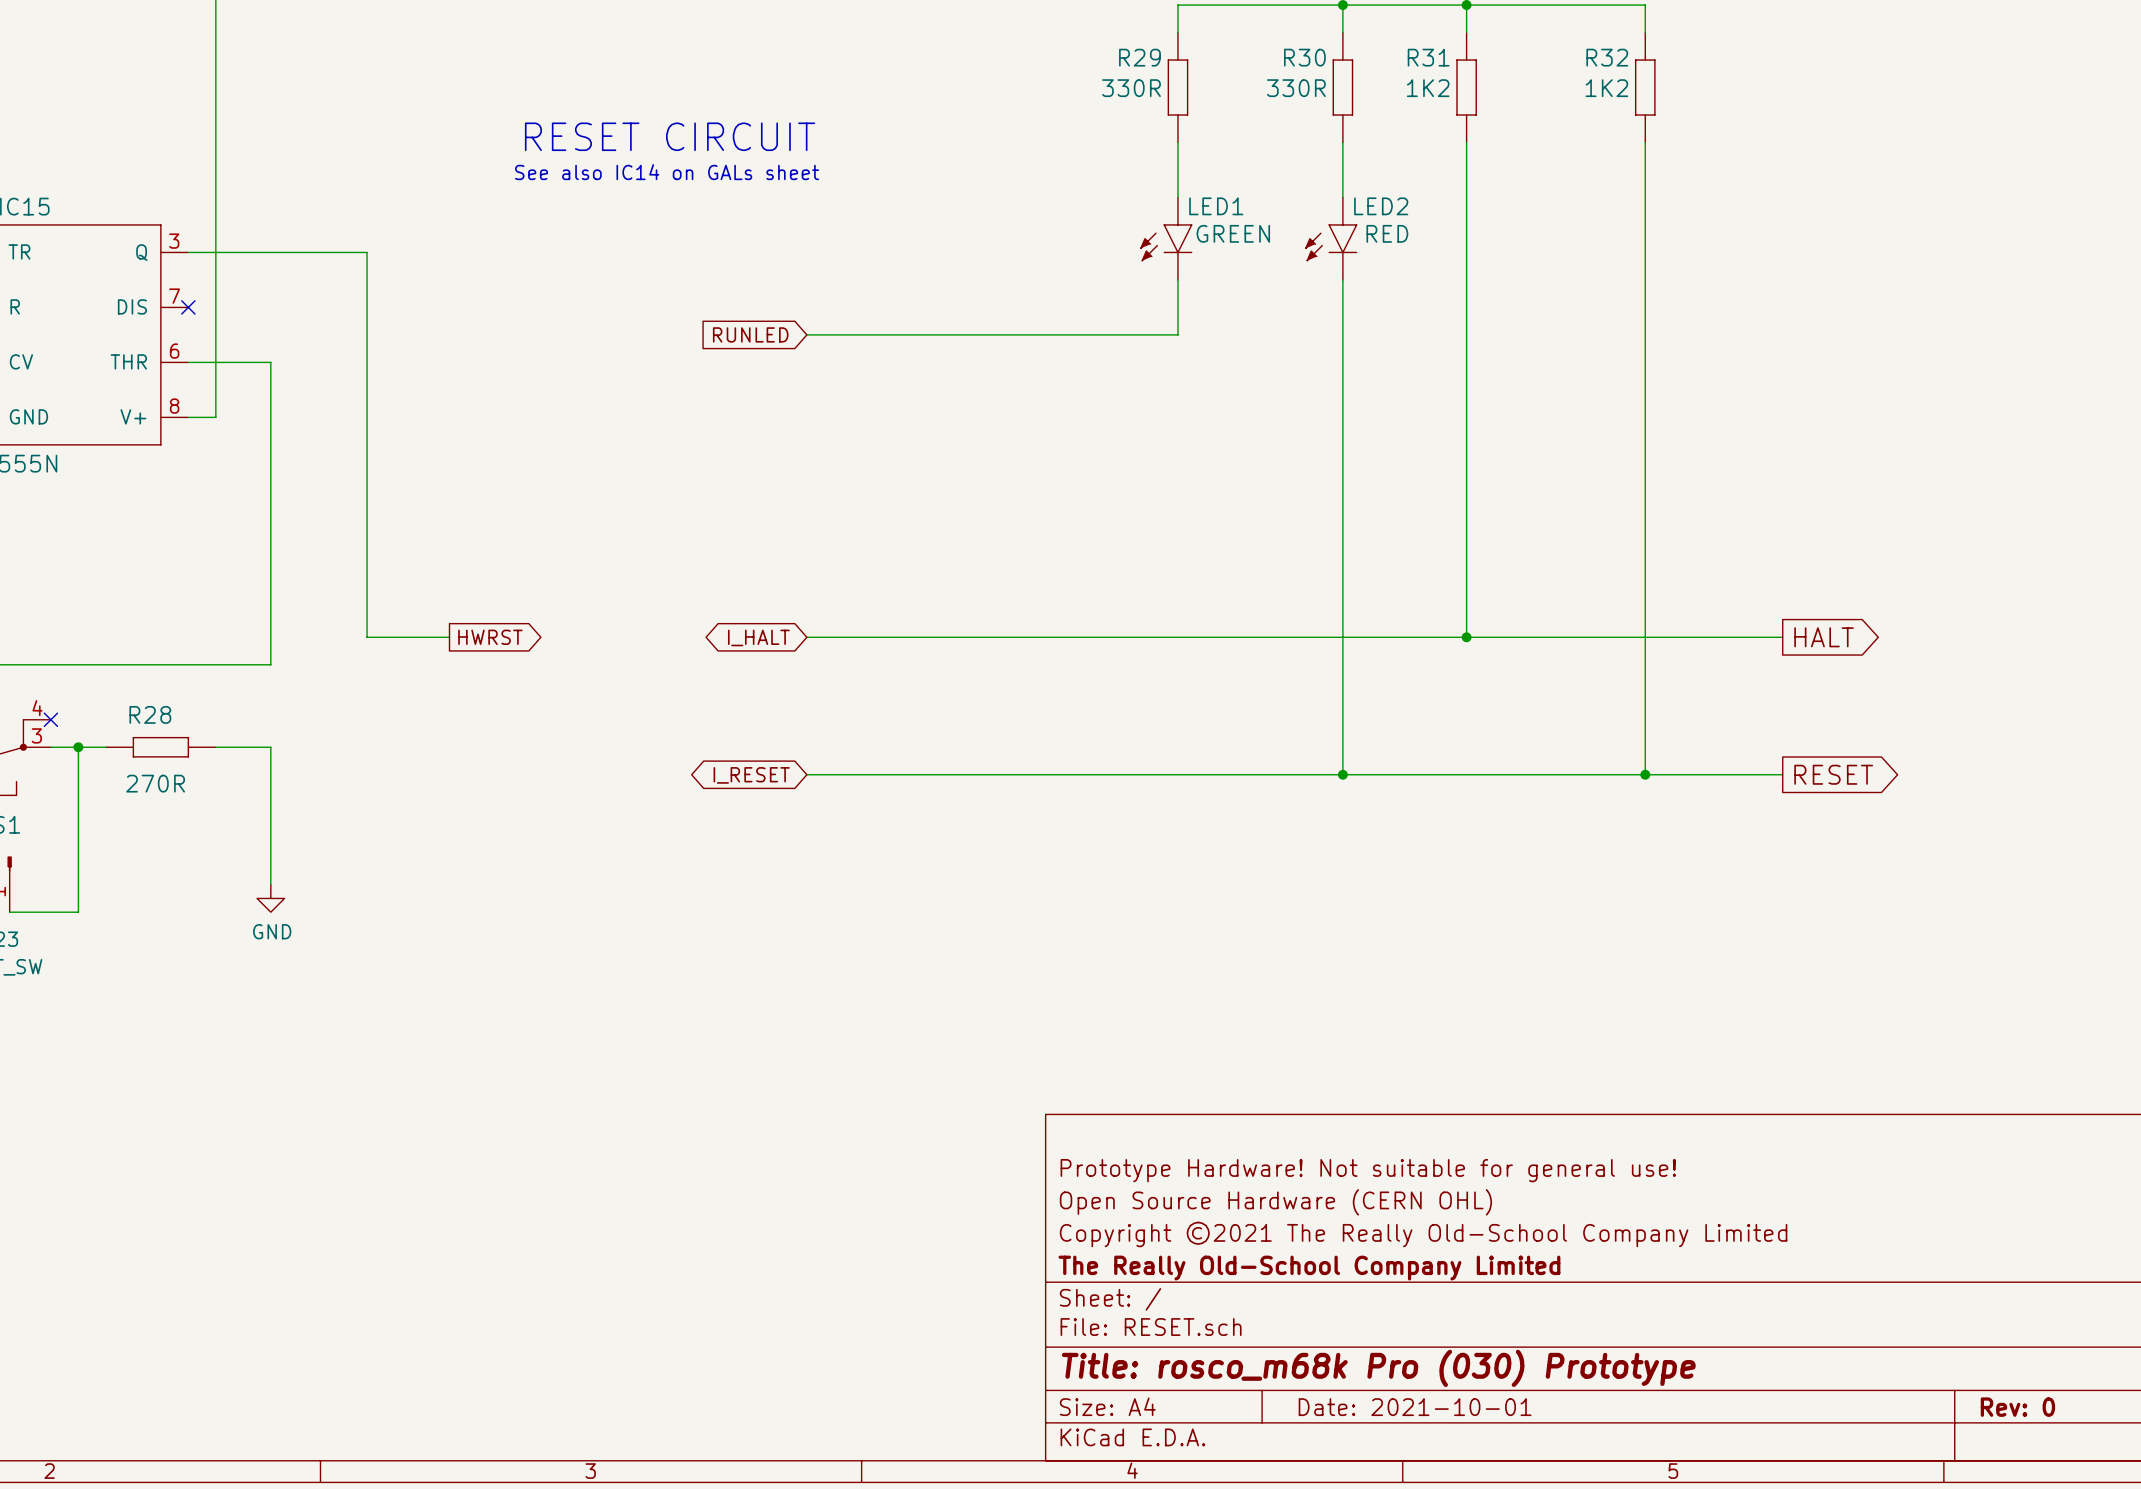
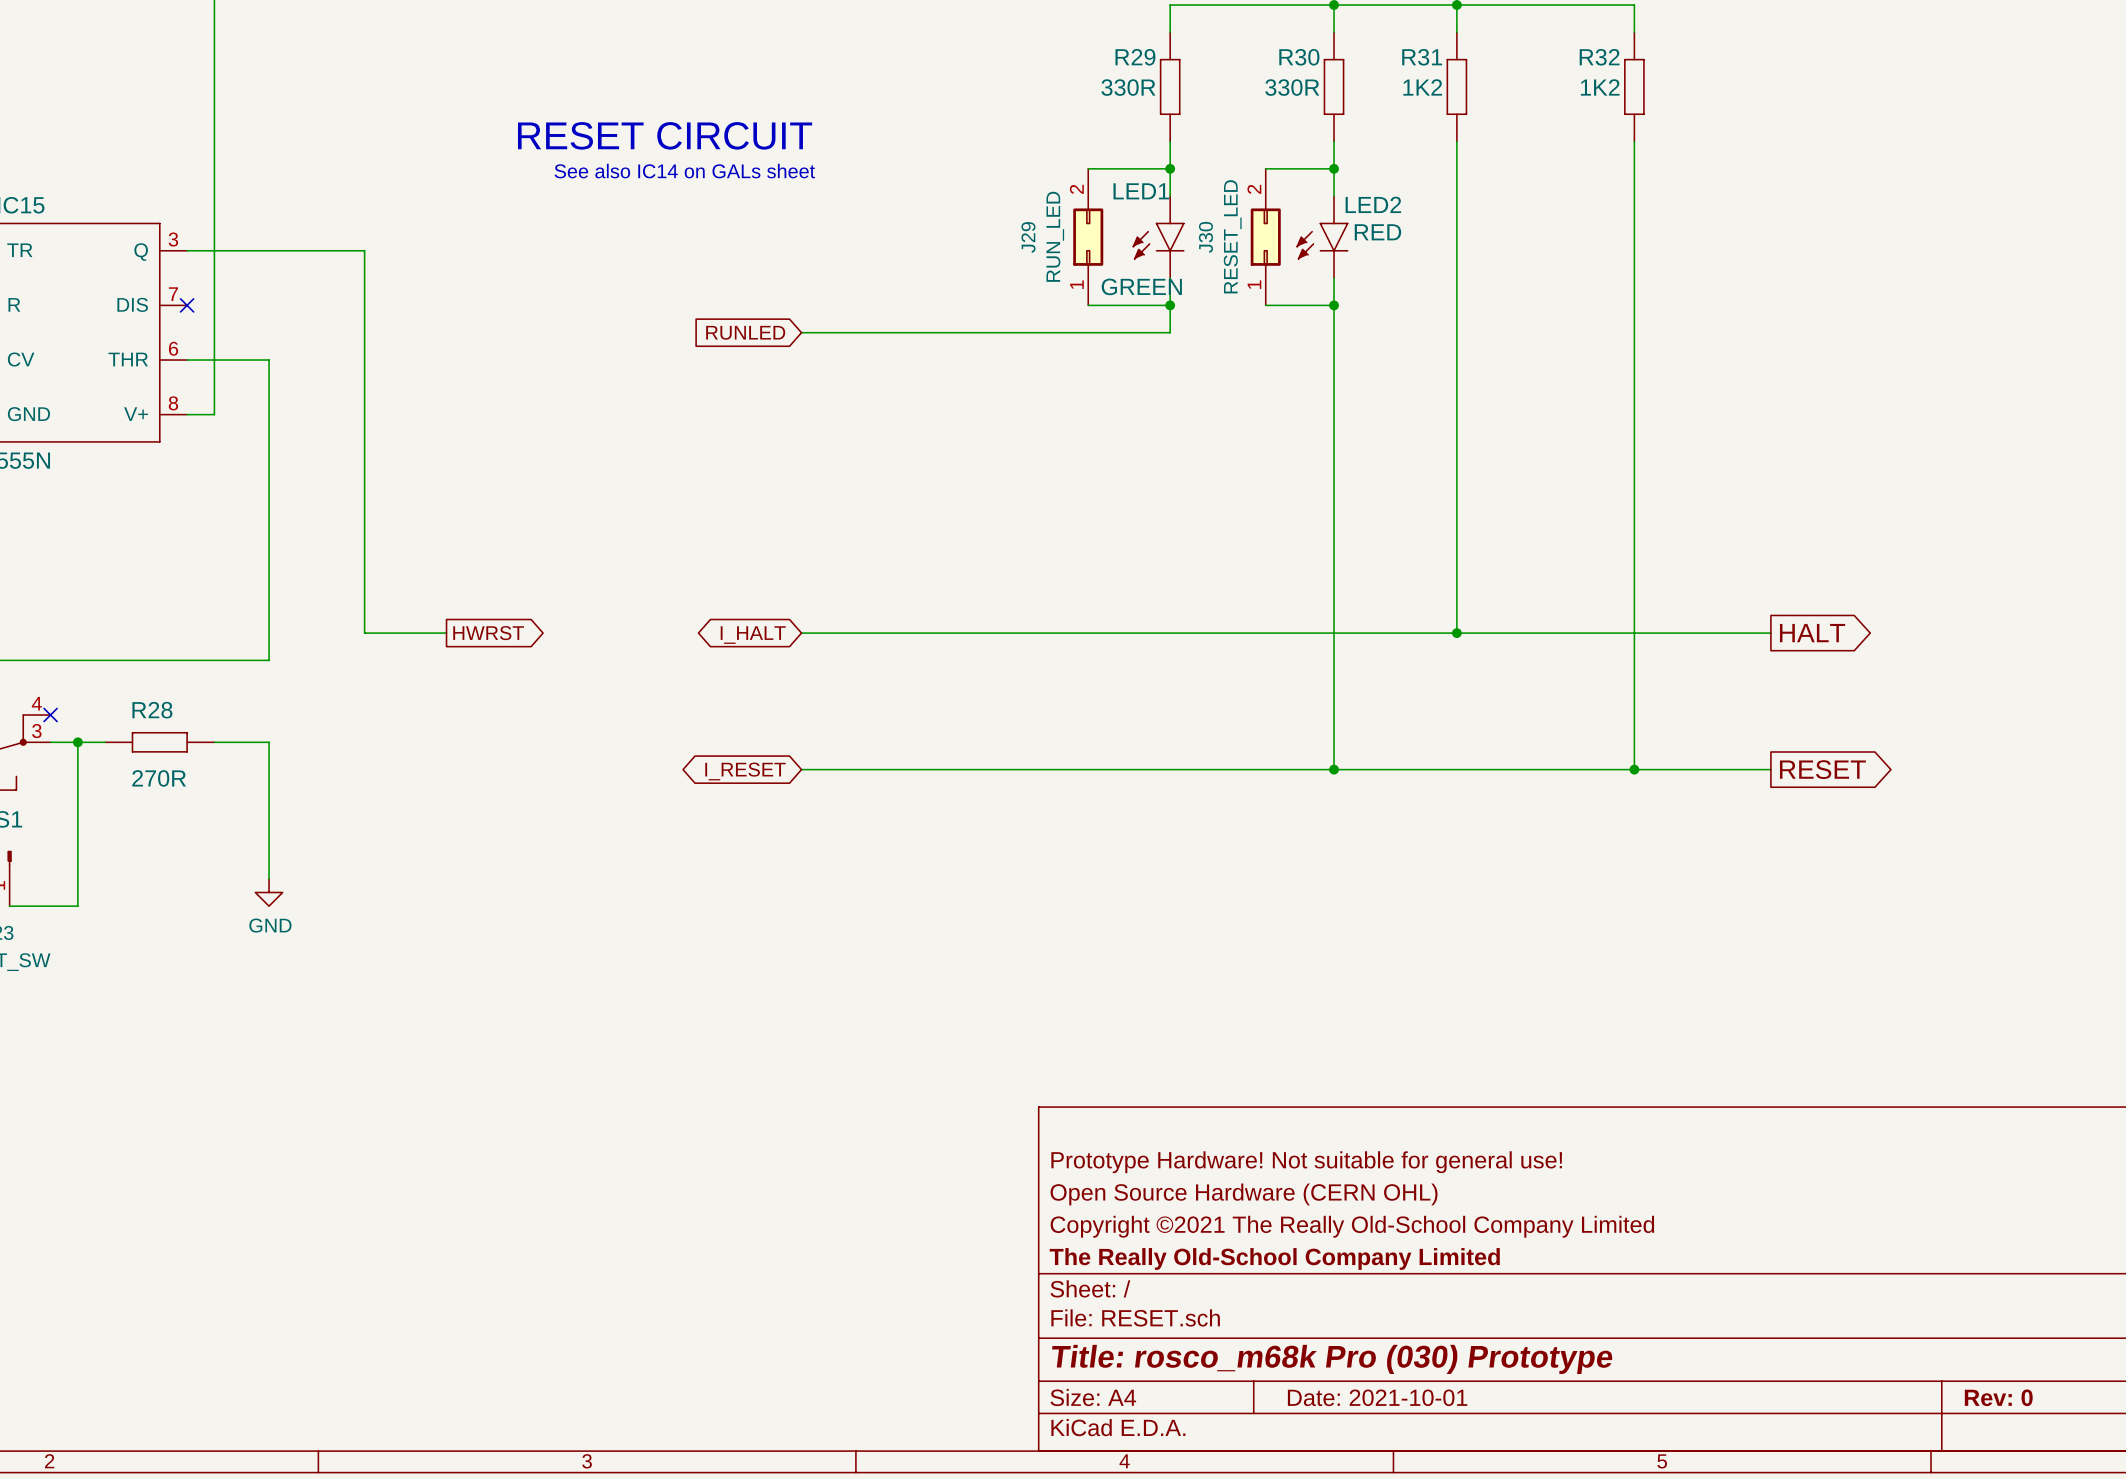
wire: none -> (1088, 168) (1170, 168)
junction: none -> (1170, 168)
wire: none -> (1265, 168) (1334, 168)
junction: none -> (1334, 168)
LED1 name position: LED1 (1216, 206) -> LED1 (1141, 191)
LED1 value position: GREEN (1233, 233) -> GREEN (1141, 286)
J29: none -> RUN_LED (1088, 237)
J30: none -> RESET_LED (1265, 237)
wire: none -> (1088, 305) (1170, 305)
junction: none -> (1170, 305)
wire: none -> (1265, 305) (1334, 305)
junction: none -> (1334, 305)

